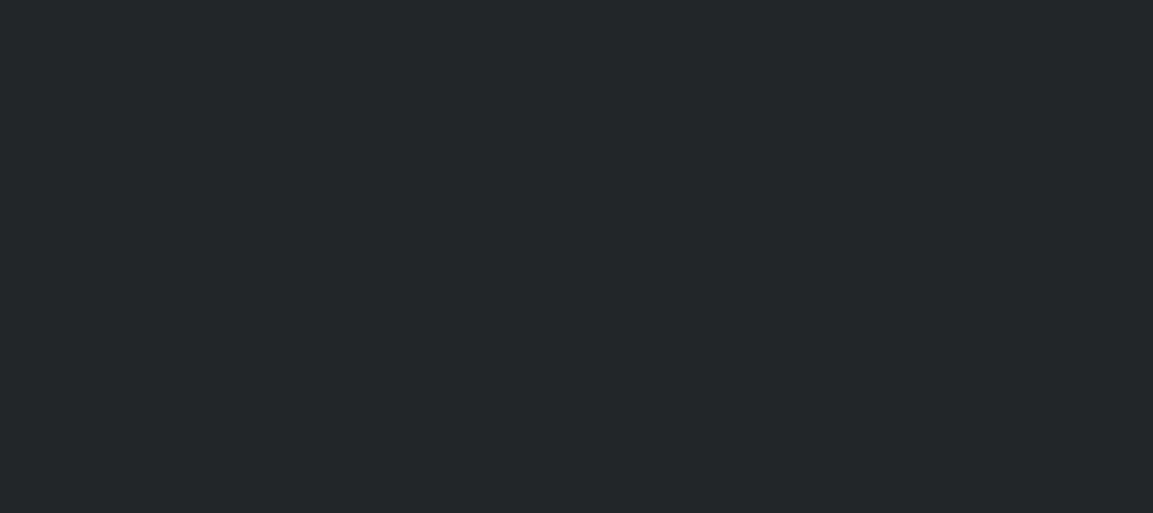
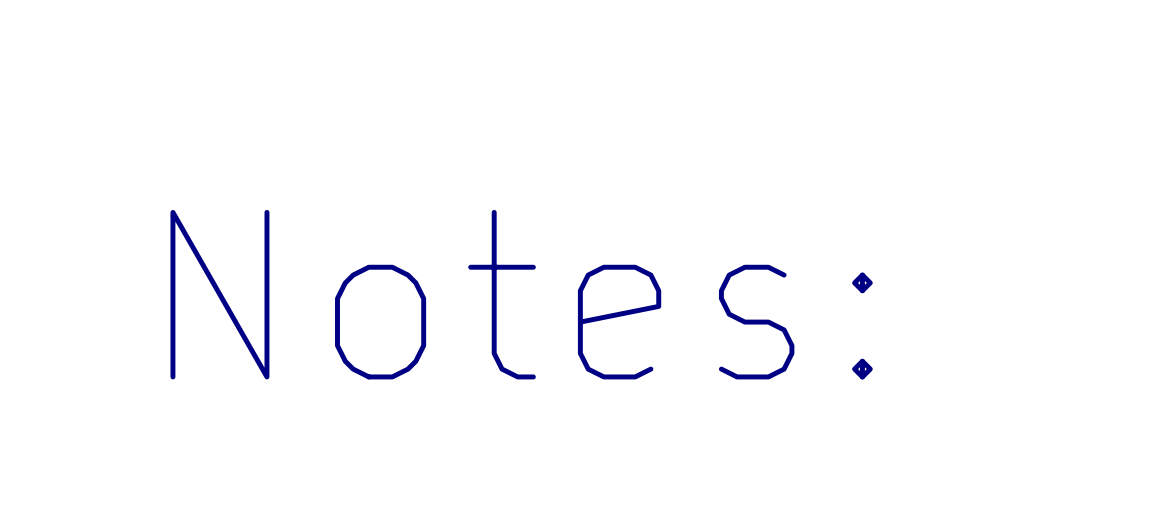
text: none -> Notes: (521, 294)

